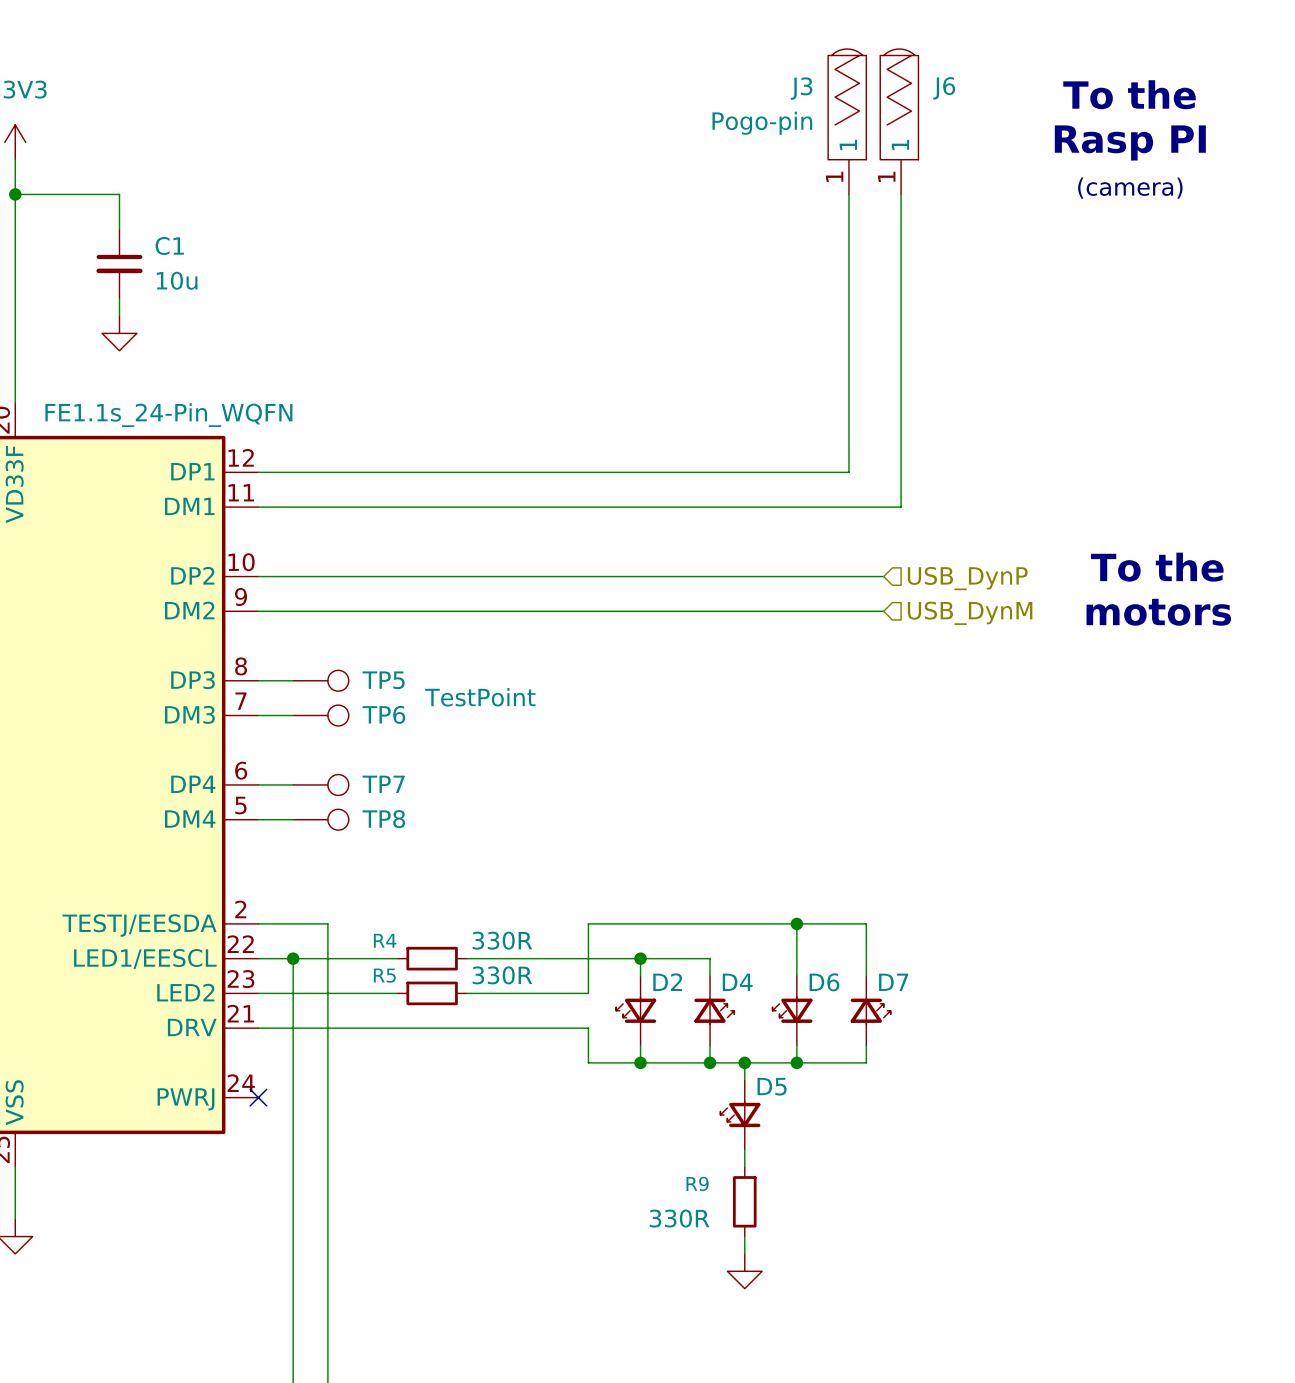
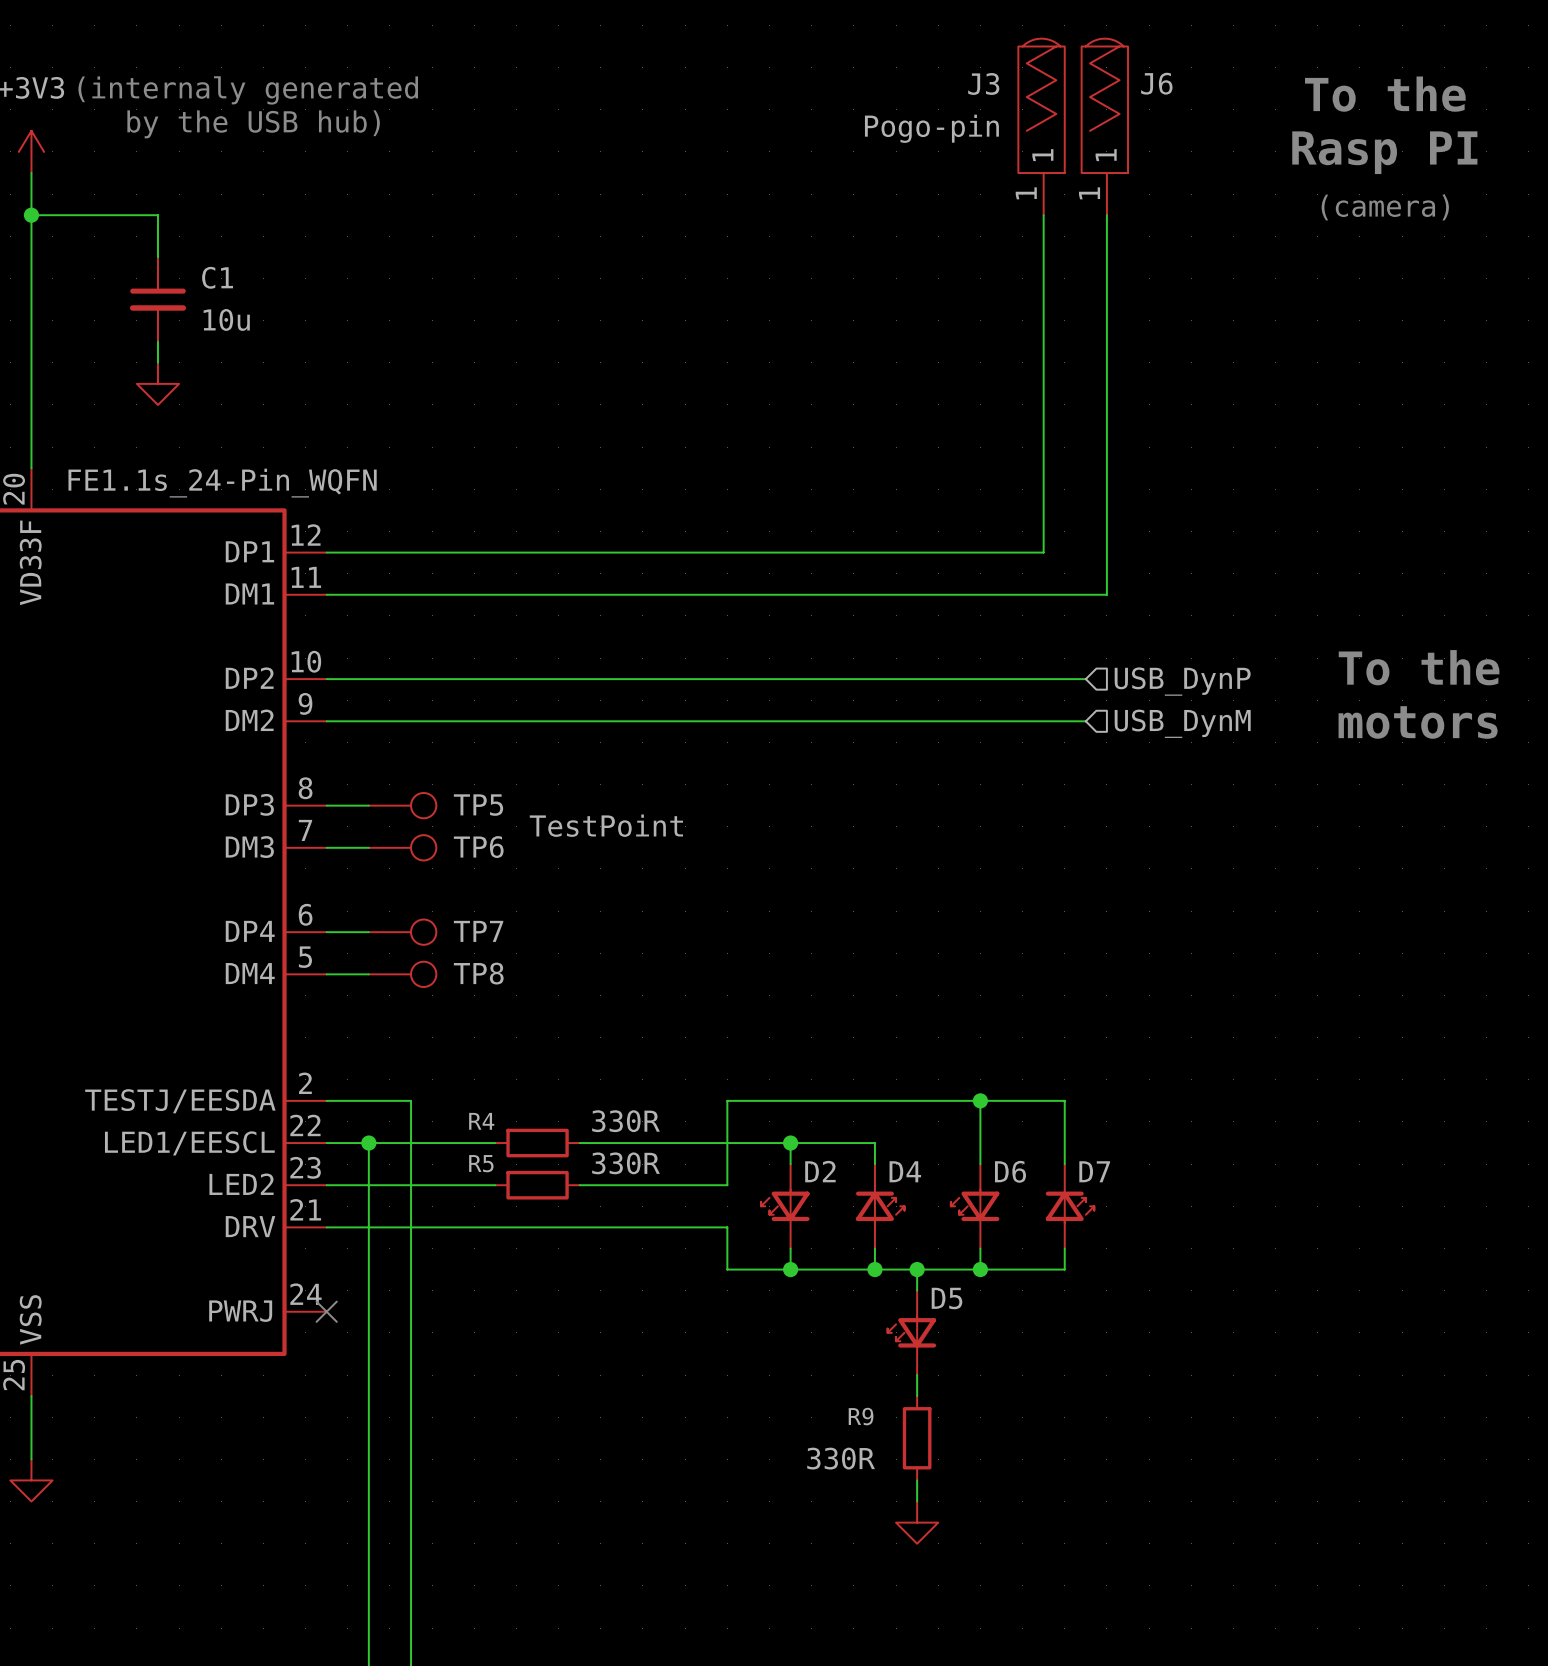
text: none -> (internaly generated (248, 90)
text: none -> by the USB hub) (253, 124)

